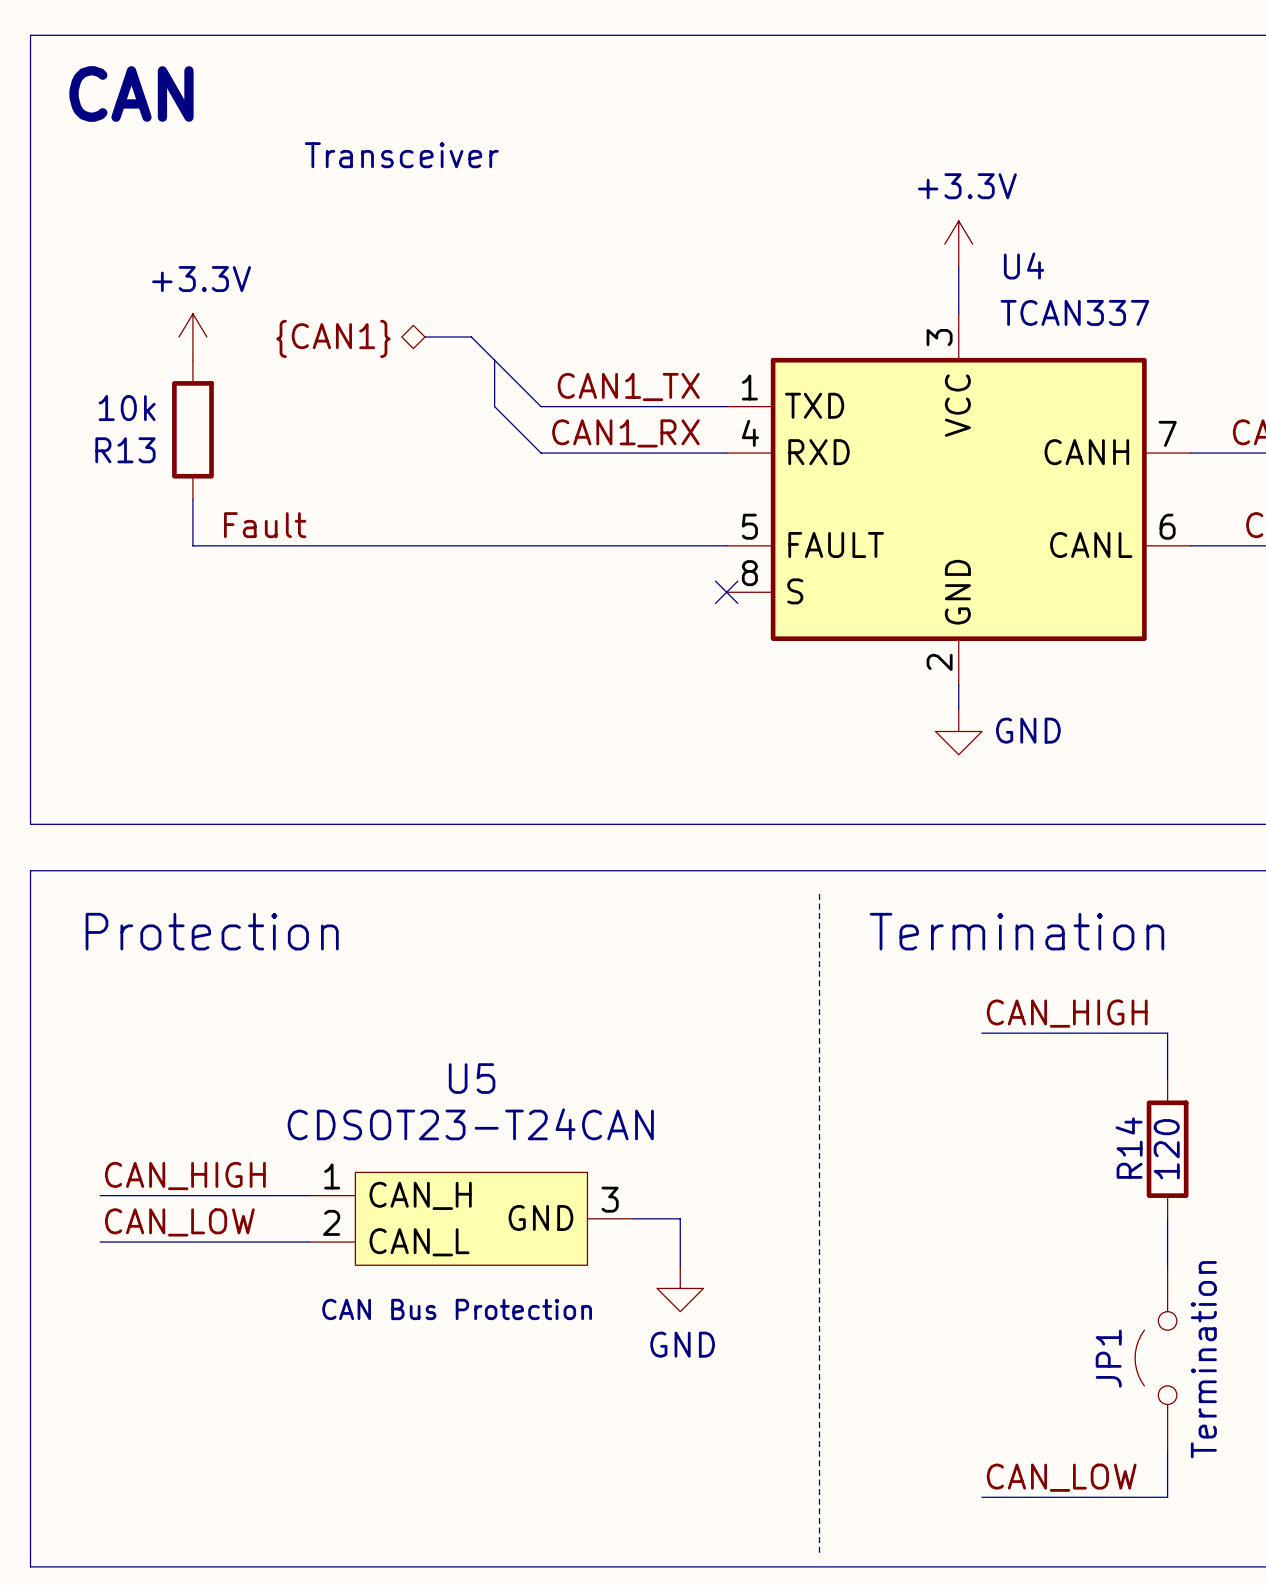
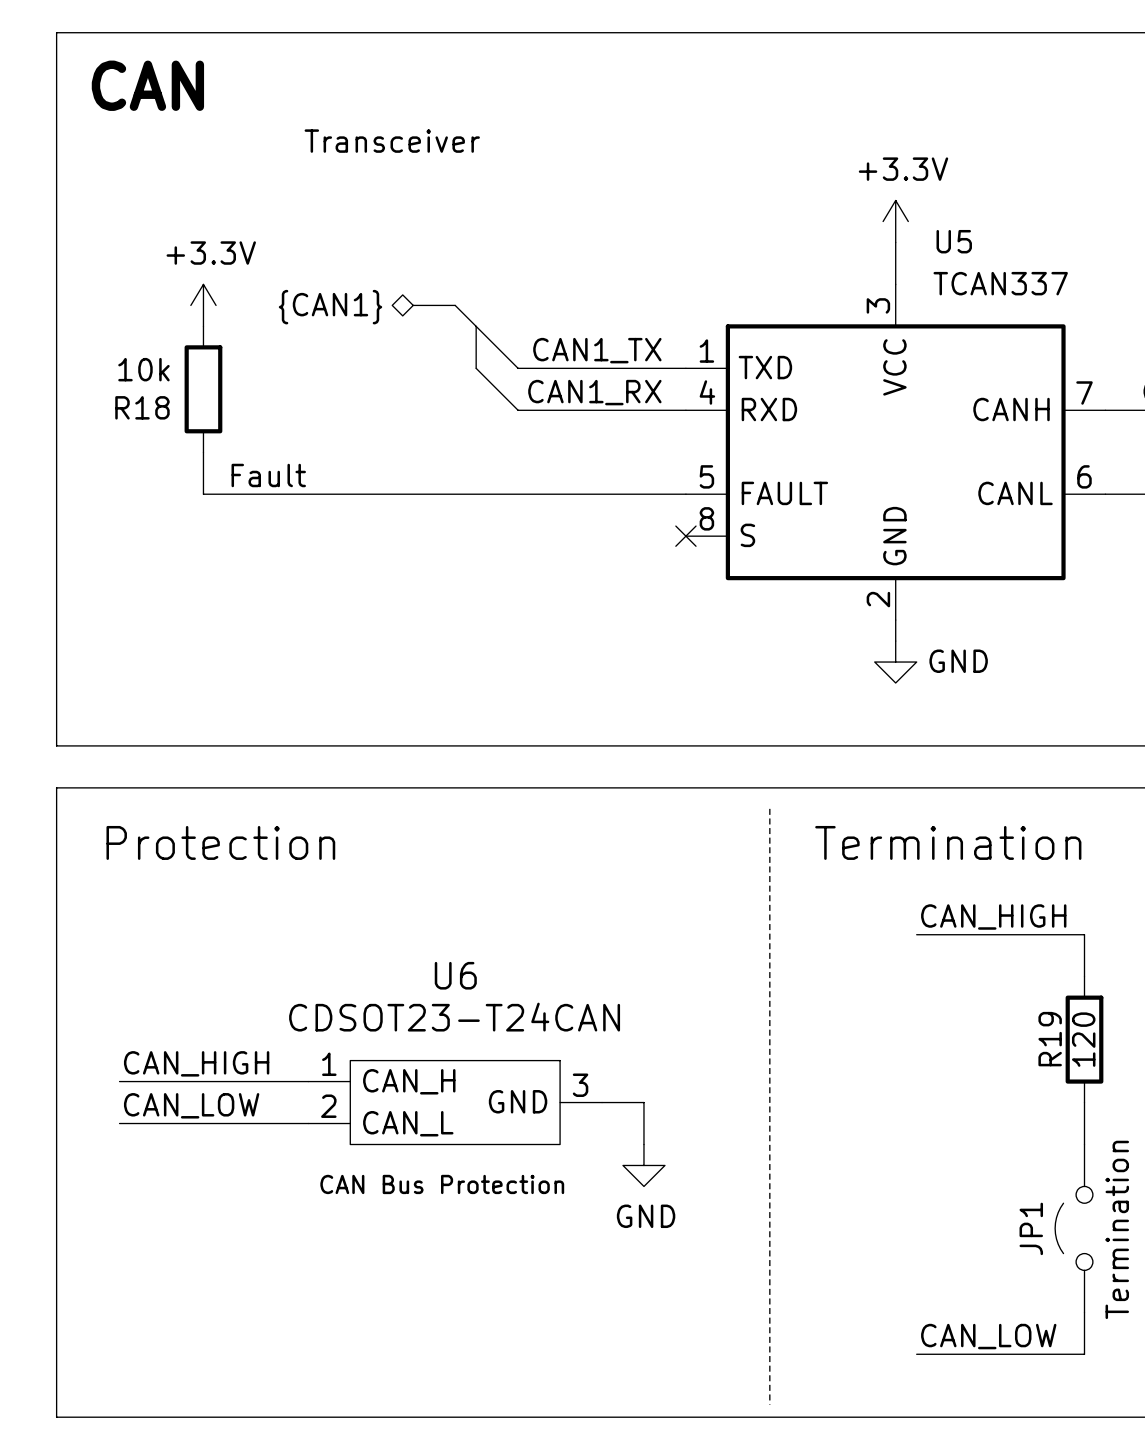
U4 name: U4 (1024, 265) -> U5 (954, 241)
R13 name: R13 (125, 450) -> R18 (142, 407)
U5 name: U5 (472, 1078) -> U6 (455, 975)
R14 name: R14 (1129, 1148) -> R19 (1050, 1039)

